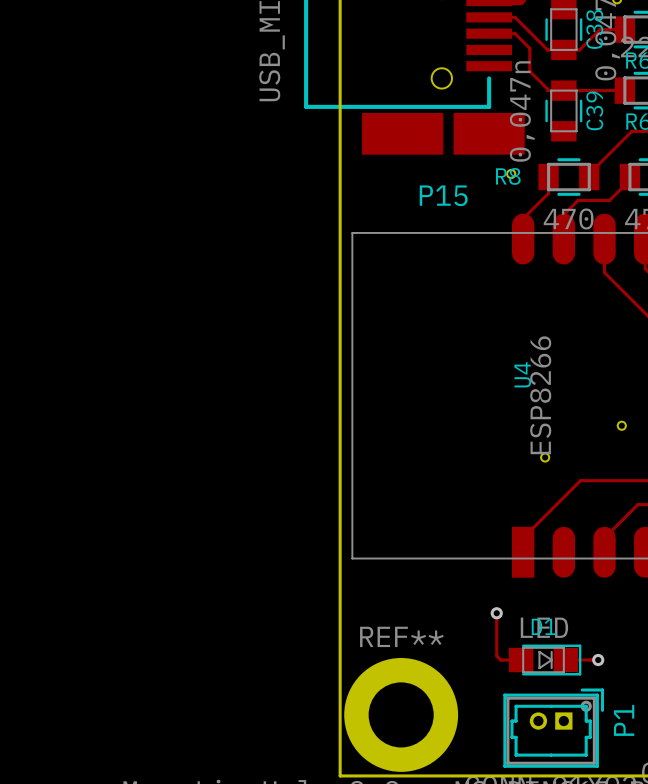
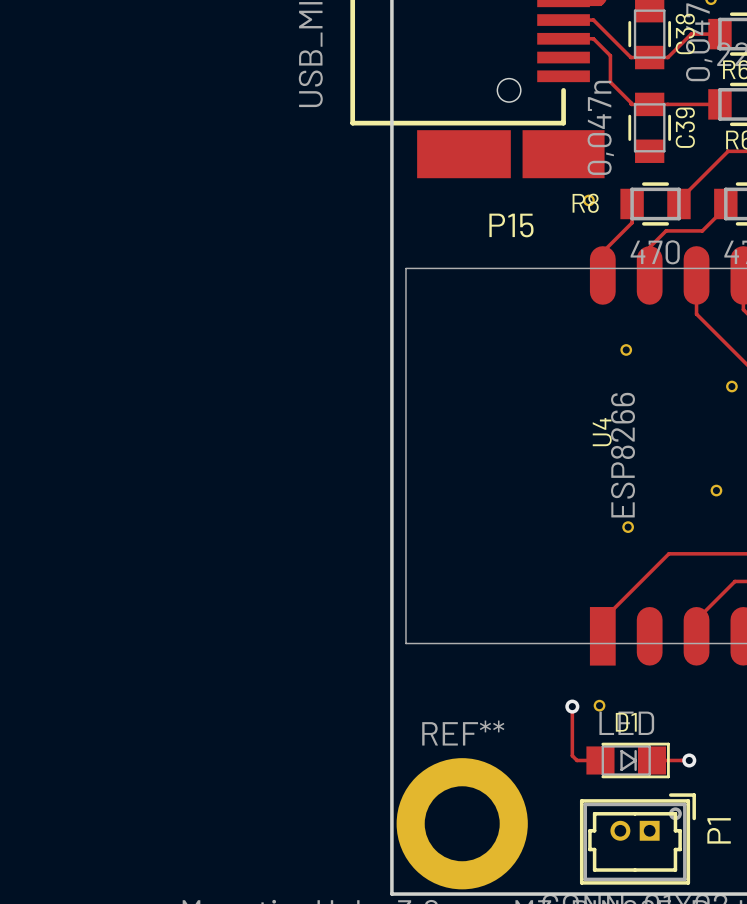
part: none -> (626, 349)
part: none -> (731, 386)
part: none -> (599, 705)

